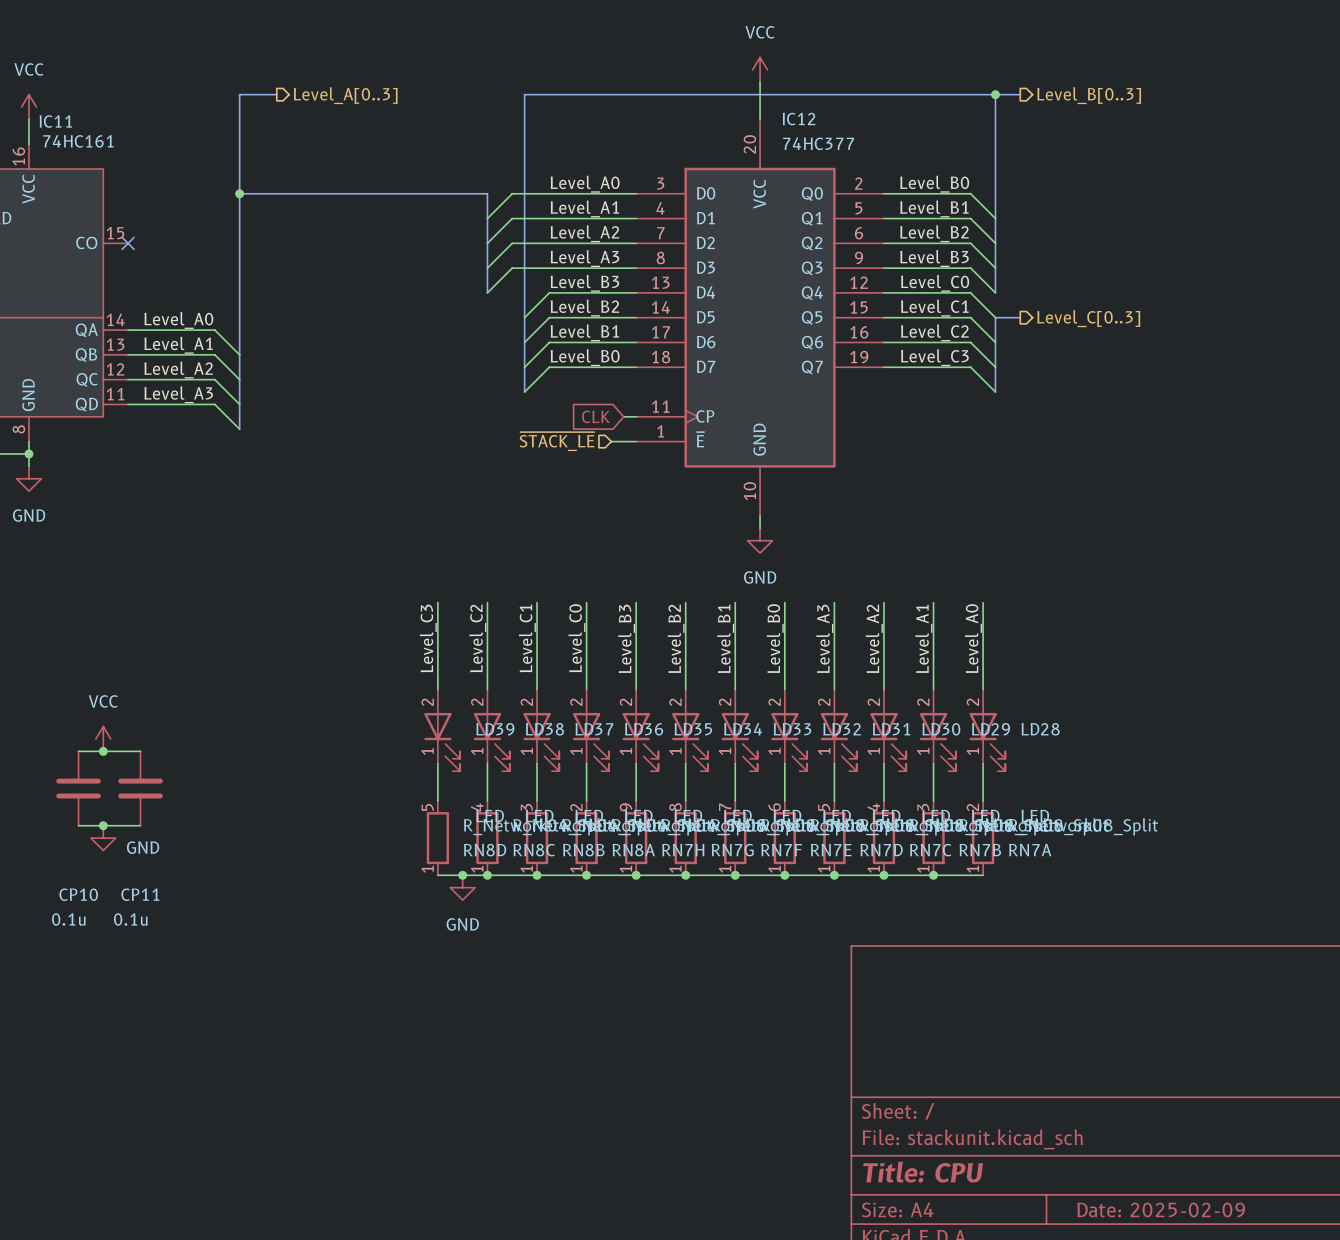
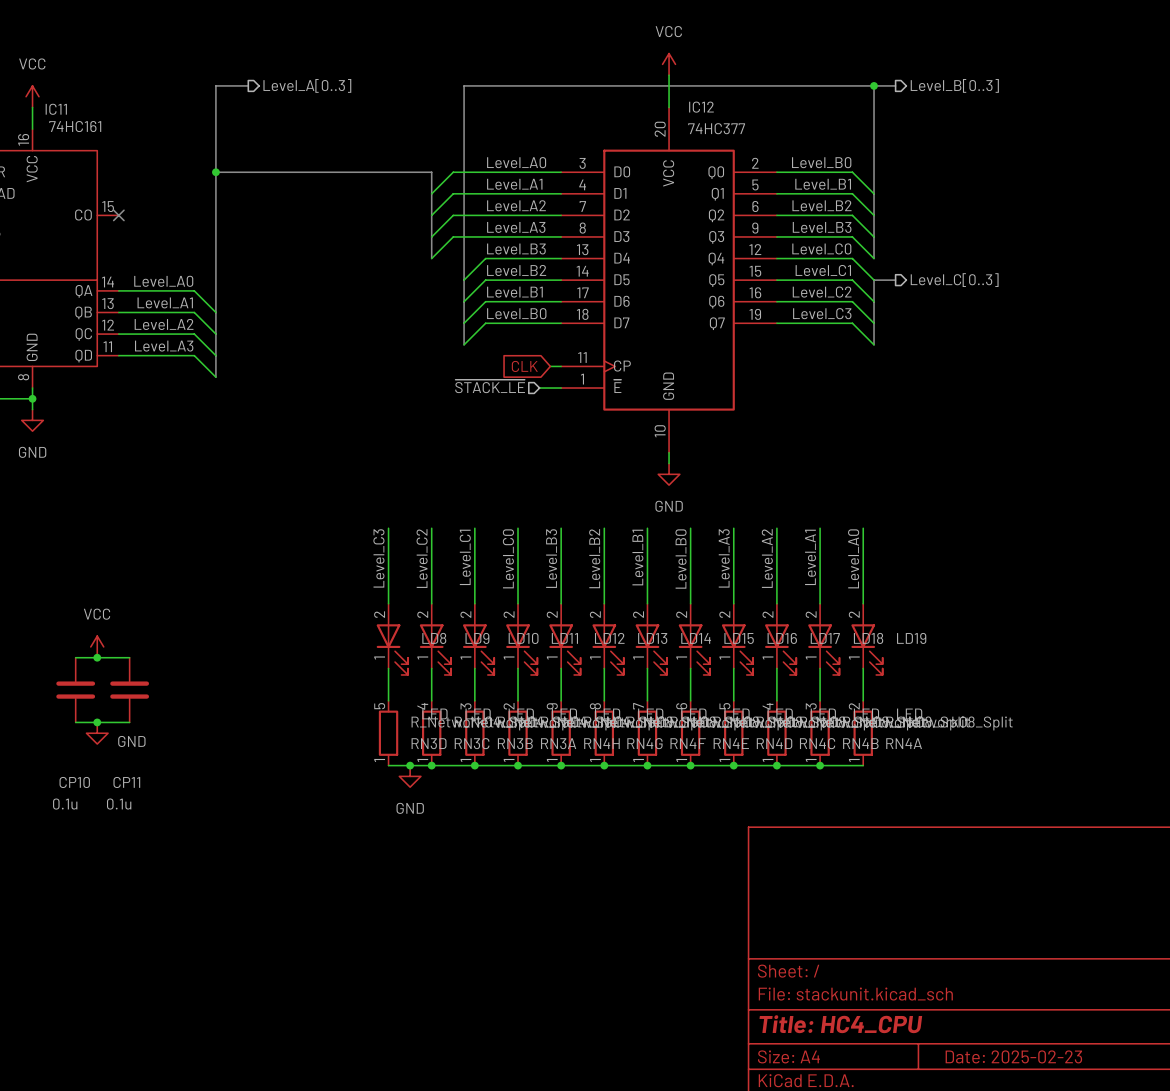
LD39 name: LD39 (495, 729) -> LD8 (434, 638)
LD38 name: LD38 (544, 729) -> LD9 (477, 638)
LD37 name: LD37 (594, 729) -> LD10 (523, 638)
LD36 name: LD36 (644, 729) -> LD11 (564, 638)
LD35 name: LD35 (693, 729) -> LD12 (609, 638)
LD34 name: LD34 (743, 729) -> LD13 (652, 638)
LD33 name: LD33 (792, 729) -> LD14 (696, 638)
LD32 name: LD32 (842, 729) -> LD15 (739, 638)
LD31 name: LD31 (891, 729) -> LD16 (782, 638)
LD30 name: LD30 (941, 729) -> LD17 (825, 638)
LD29 name: LD29 (991, 729) -> LD18 (868, 638)
LD28 name: LD28 (1040, 729) -> LD19 (911, 638)
RN8D name: RN8D (485, 850) -> RN3D (429, 743)
RN8C name: RN8C (534, 850) -> RN3C (472, 743)
RN8B name: RN8B (583, 850) -> RN3B (515, 743)
RN8A name: RN8A (633, 850) -> RN3A (558, 743)
RN7H name: RN7H (683, 850) -> RN4H (601, 743)
RN7G name: RN7G (732, 850) -> RN4G (644, 743)
RN7F name: RN7F (781, 850) -> RN4F (688, 743)
RN7E name: RN7E (831, 850) -> RN4E (731, 743)
RN7D name: RN7D (881, 850) -> RN4D (774, 743)
RN7C name: RN7C (930, 850) -> RN4C (817, 743)
RN7B name: RN7B (980, 850) -> RN4B (860, 743)
RN7A name: RN7A (1030, 850) -> RN4A (904, 743)
title block: Title: CPU (923, 1172) -> Title: HC4_CPU (840, 1024)
title block: Date: 2025-02-09 (1161, 1209) -> Date: 2025-02-23 (1013, 1056)

